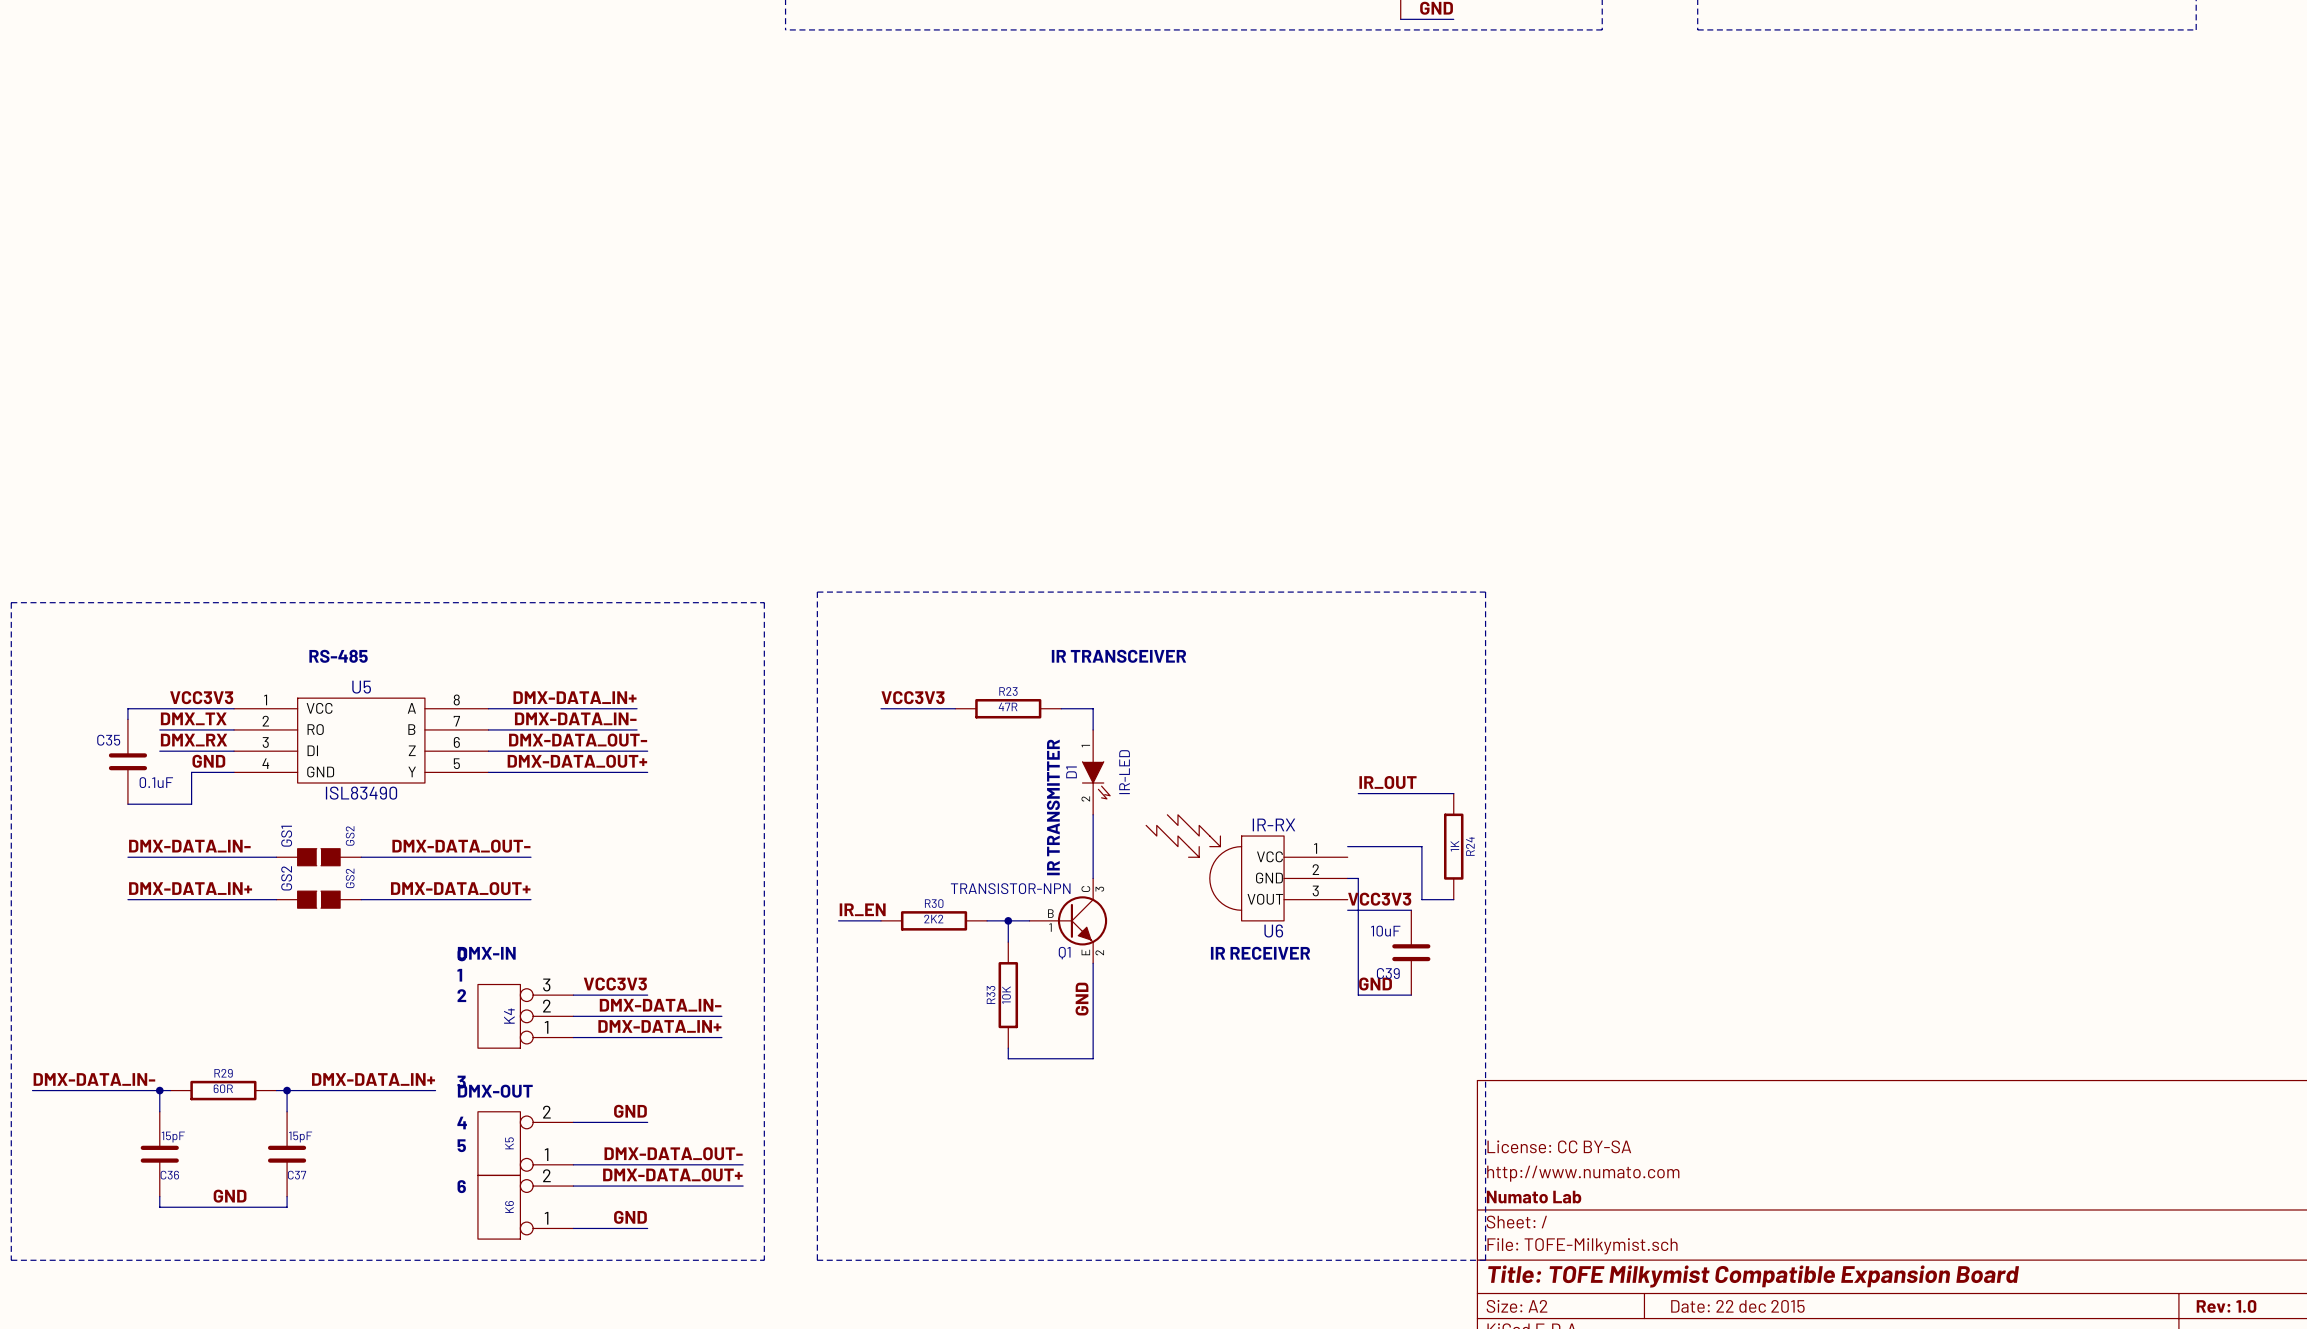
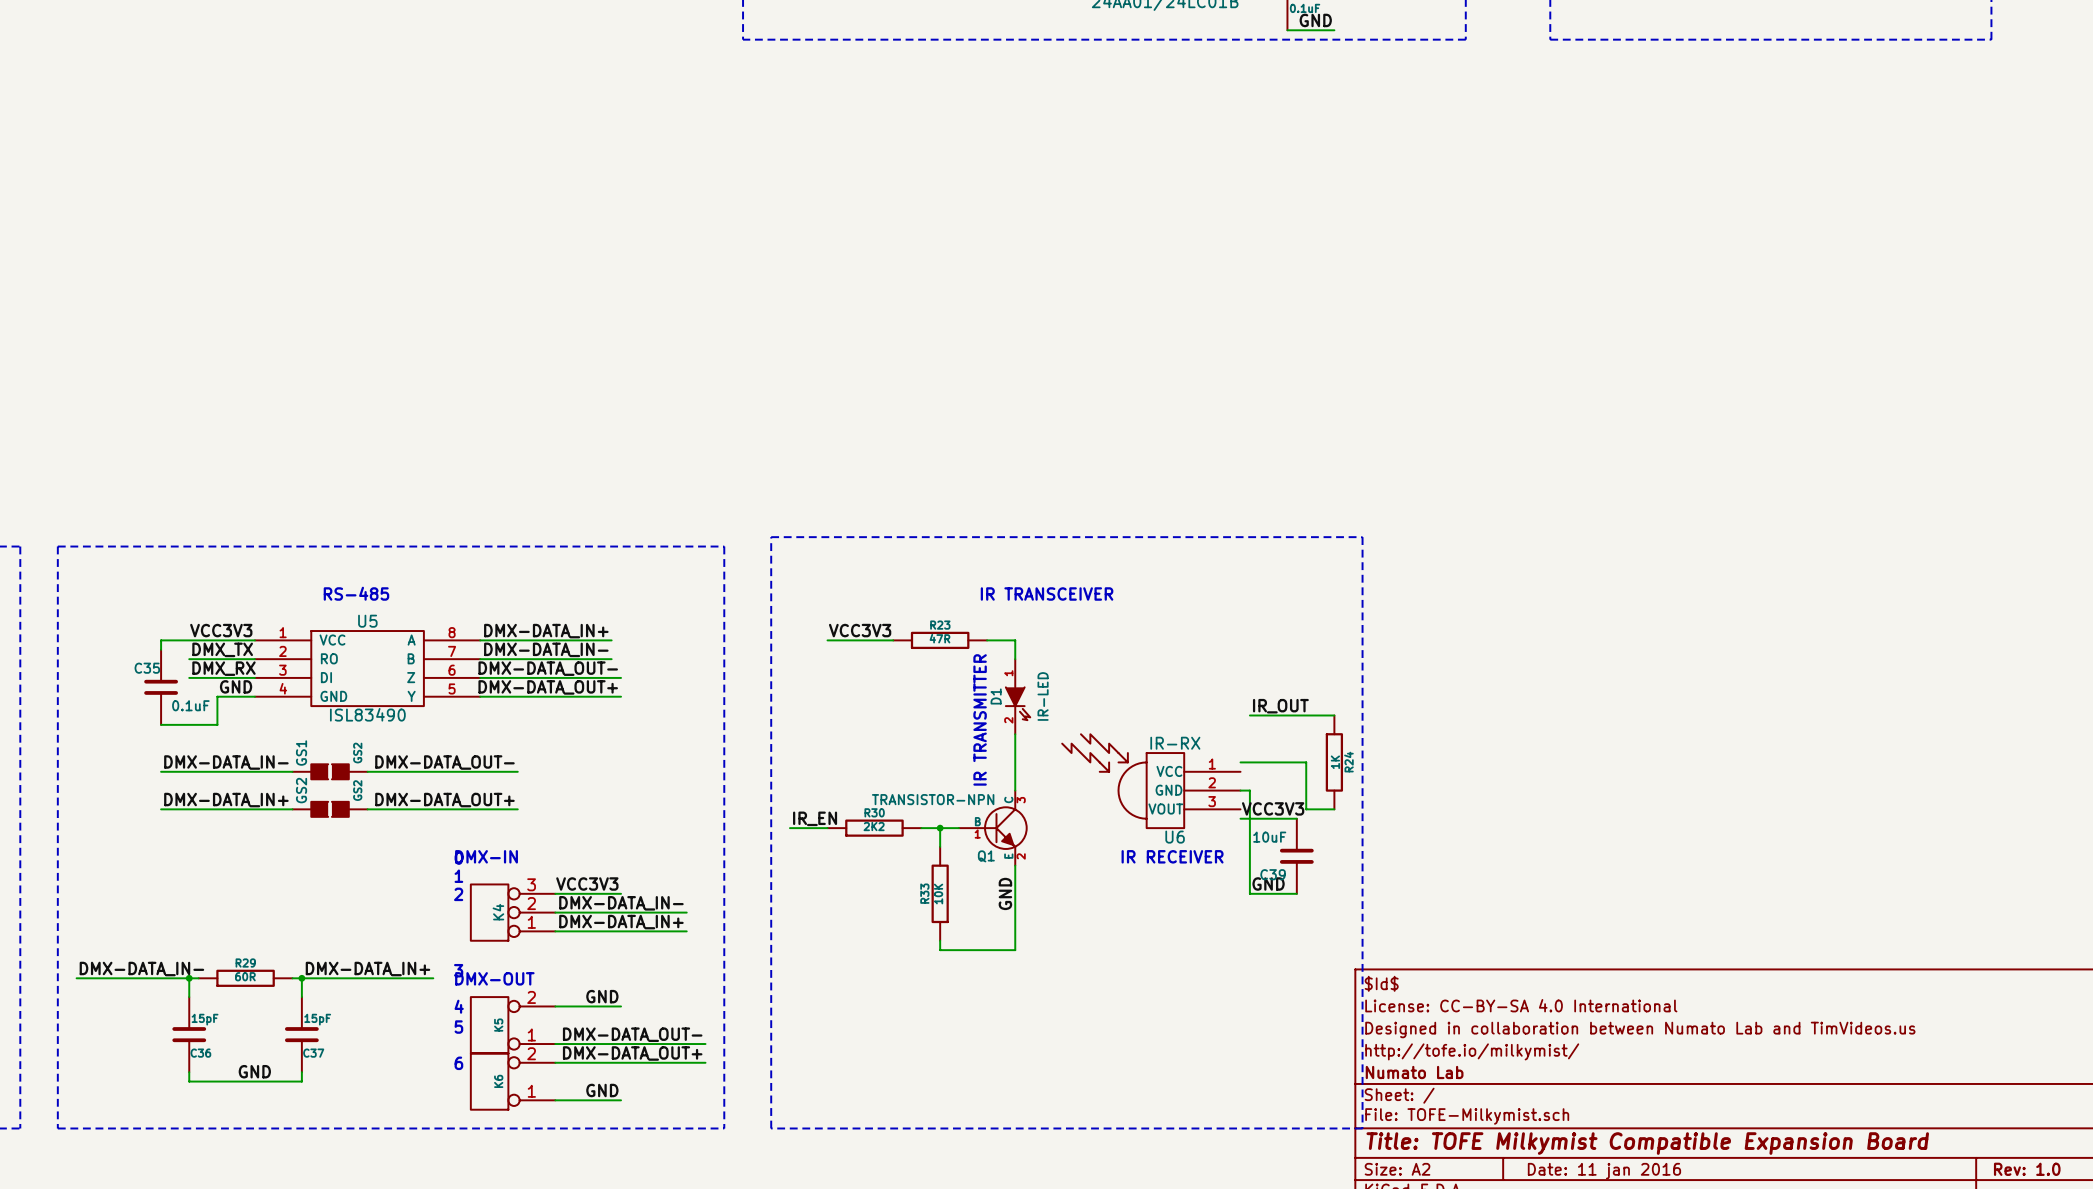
title block: none -> $Id$ (1381, 983)
title block: none -> License: CC-BY-SA 4.0 International (1521, 1005)
title block: License: CC BY-SA (1559, 1146) -> Designed in collaboration between Numato Lab and TimVideos.us (1640, 1029)
title block: http://www.numato.com (1583, 1173) -> http://tofe.io/milkymist/ (1472, 1051)
title block: Date: 22 dec 2015 (1737, 1306) -> Date: 11 jan 2016 (1604, 1171)

